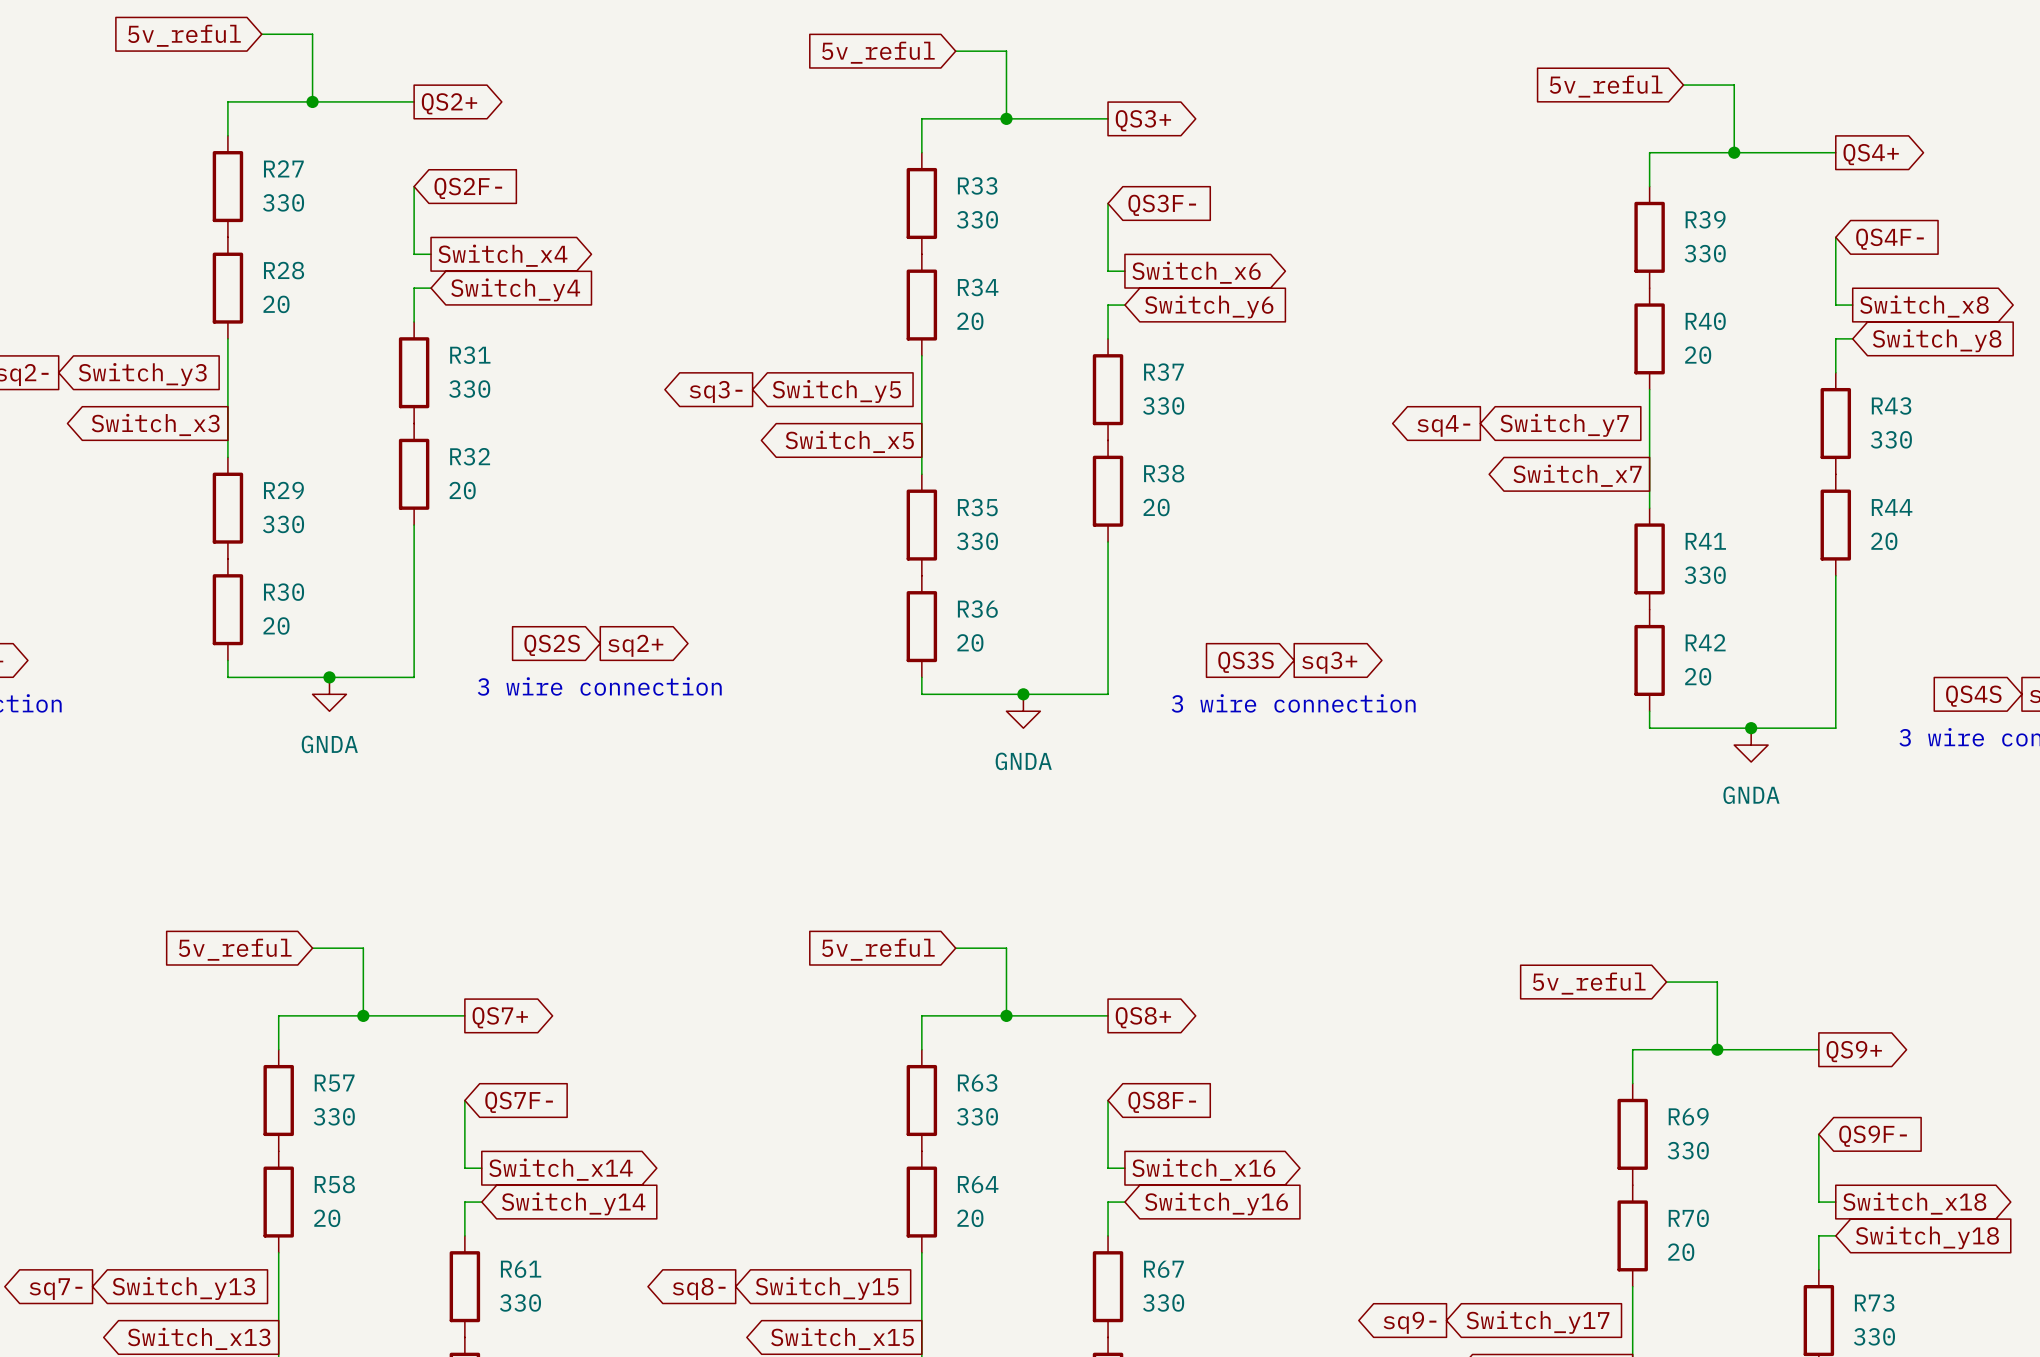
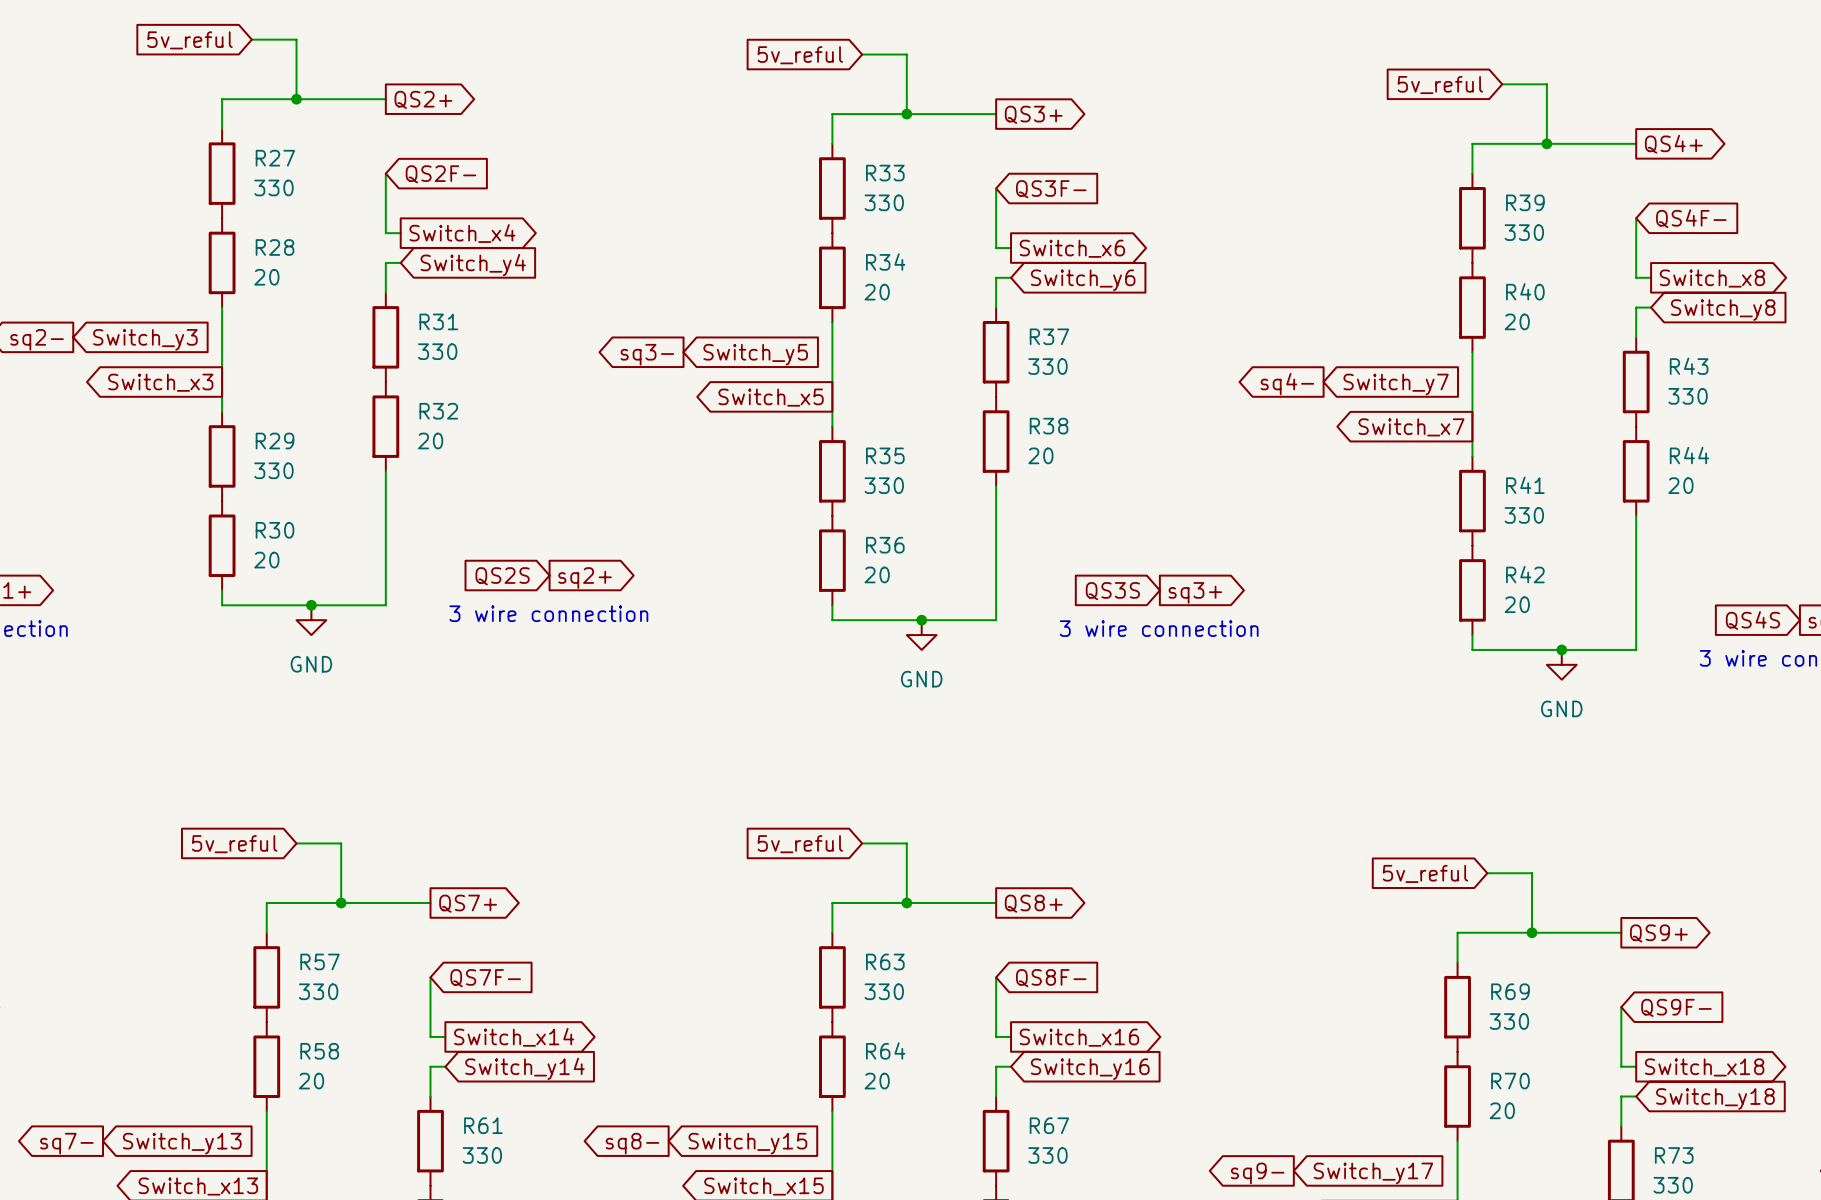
power symbol: GNDA (329, 694) -> GND (311, 620)
power symbol: GNDA (1023, 711) -> GND (921, 635)
power symbol: GNDA (1751, 745) -> GND (1561, 664)

